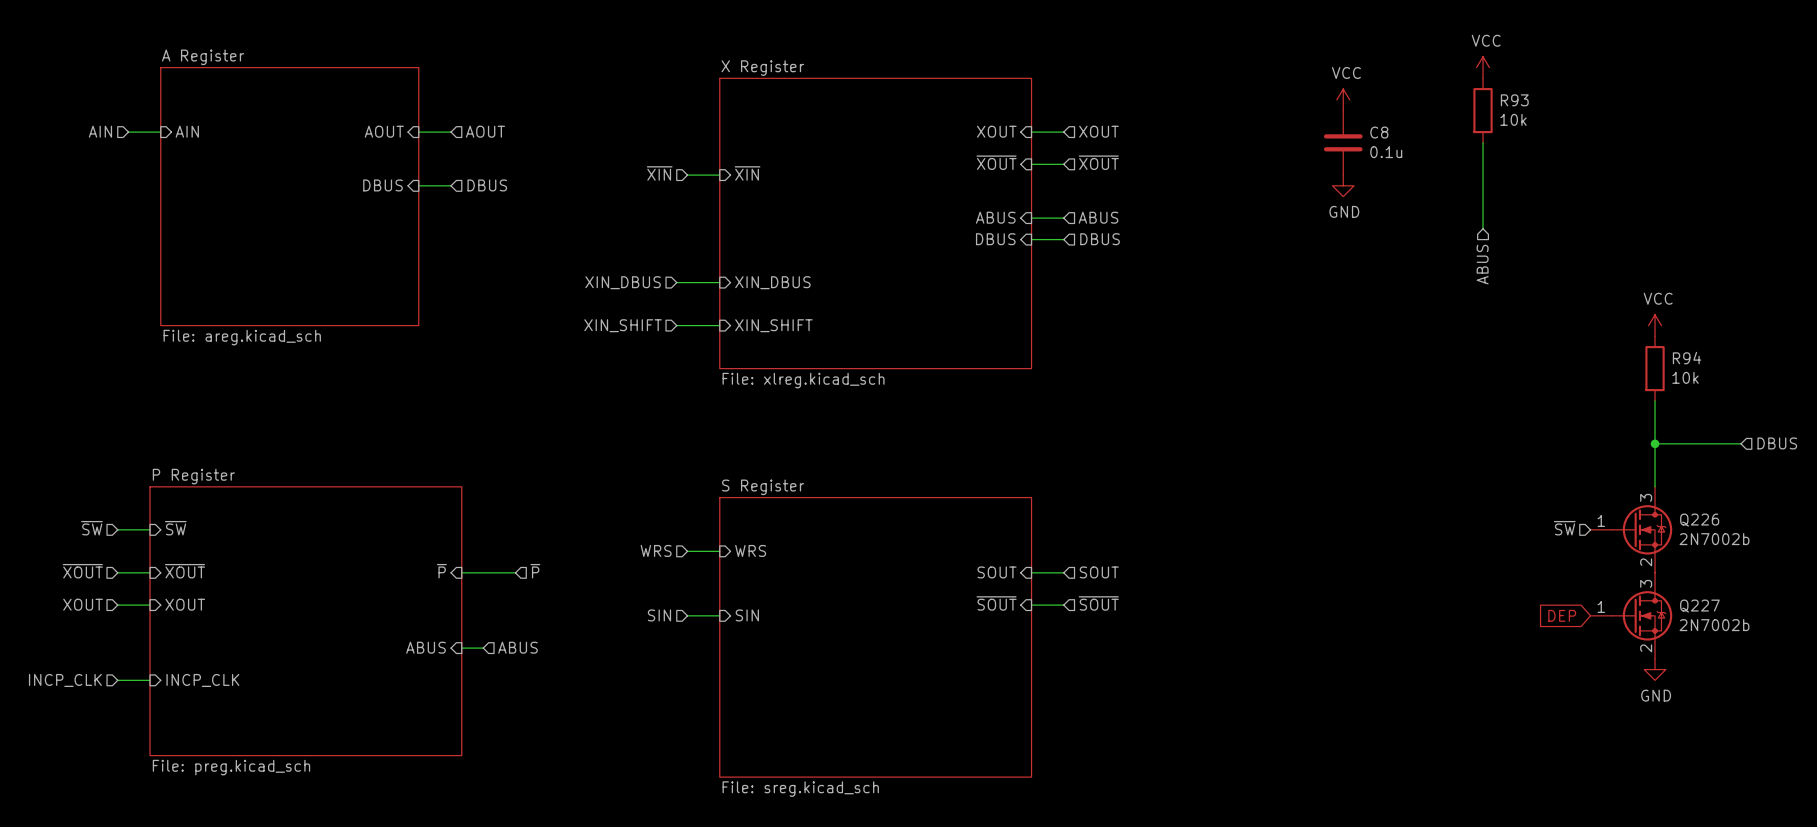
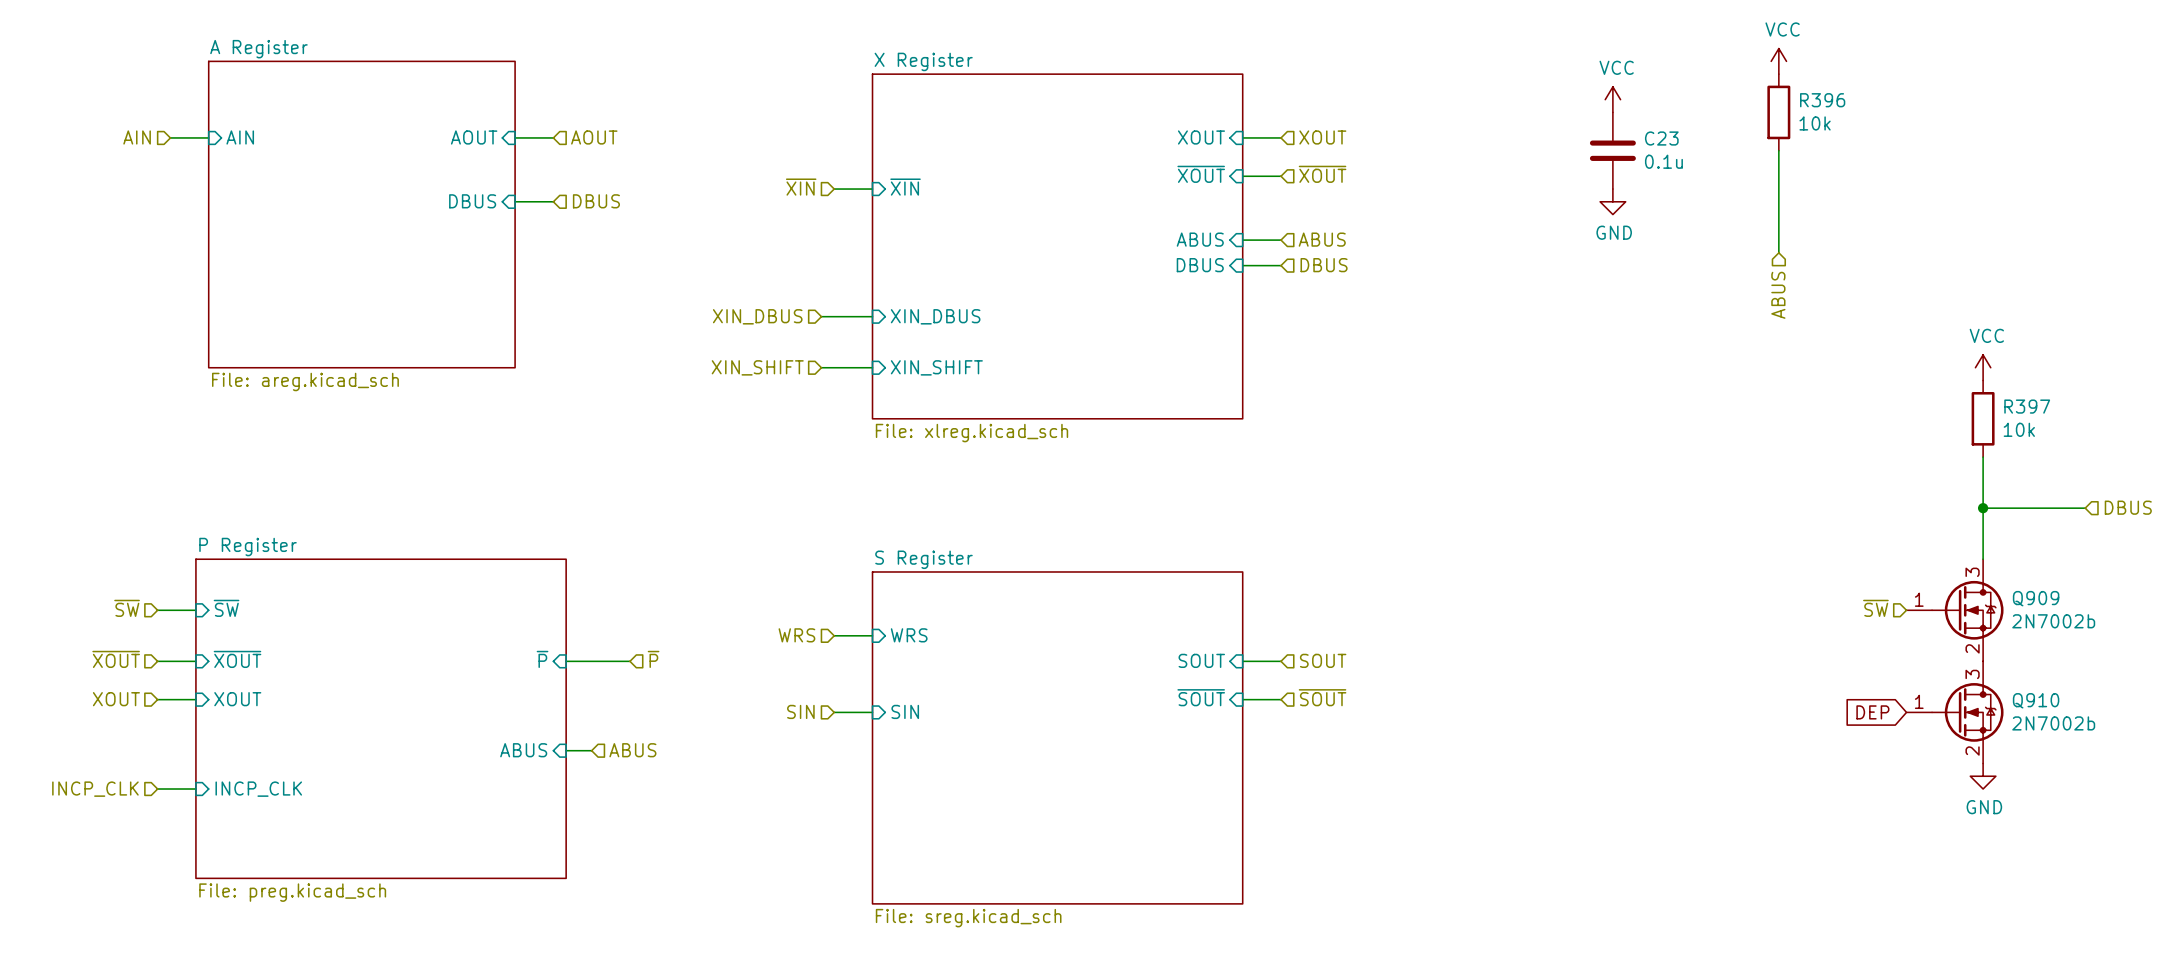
R93 name: R93 (1514, 100) -> R396 (1822, 100)
C8 name: C8 (1379, 132) -> C23 (1661, 138)
R94 name: R94 (1687, 358) -> R397 (2027, 406)
Q226 name: Q226 (1699, 520) -> Q909 (2036, 598)
Q227 name: Q227 (1699, 606) -> Q910 (2036, 700)

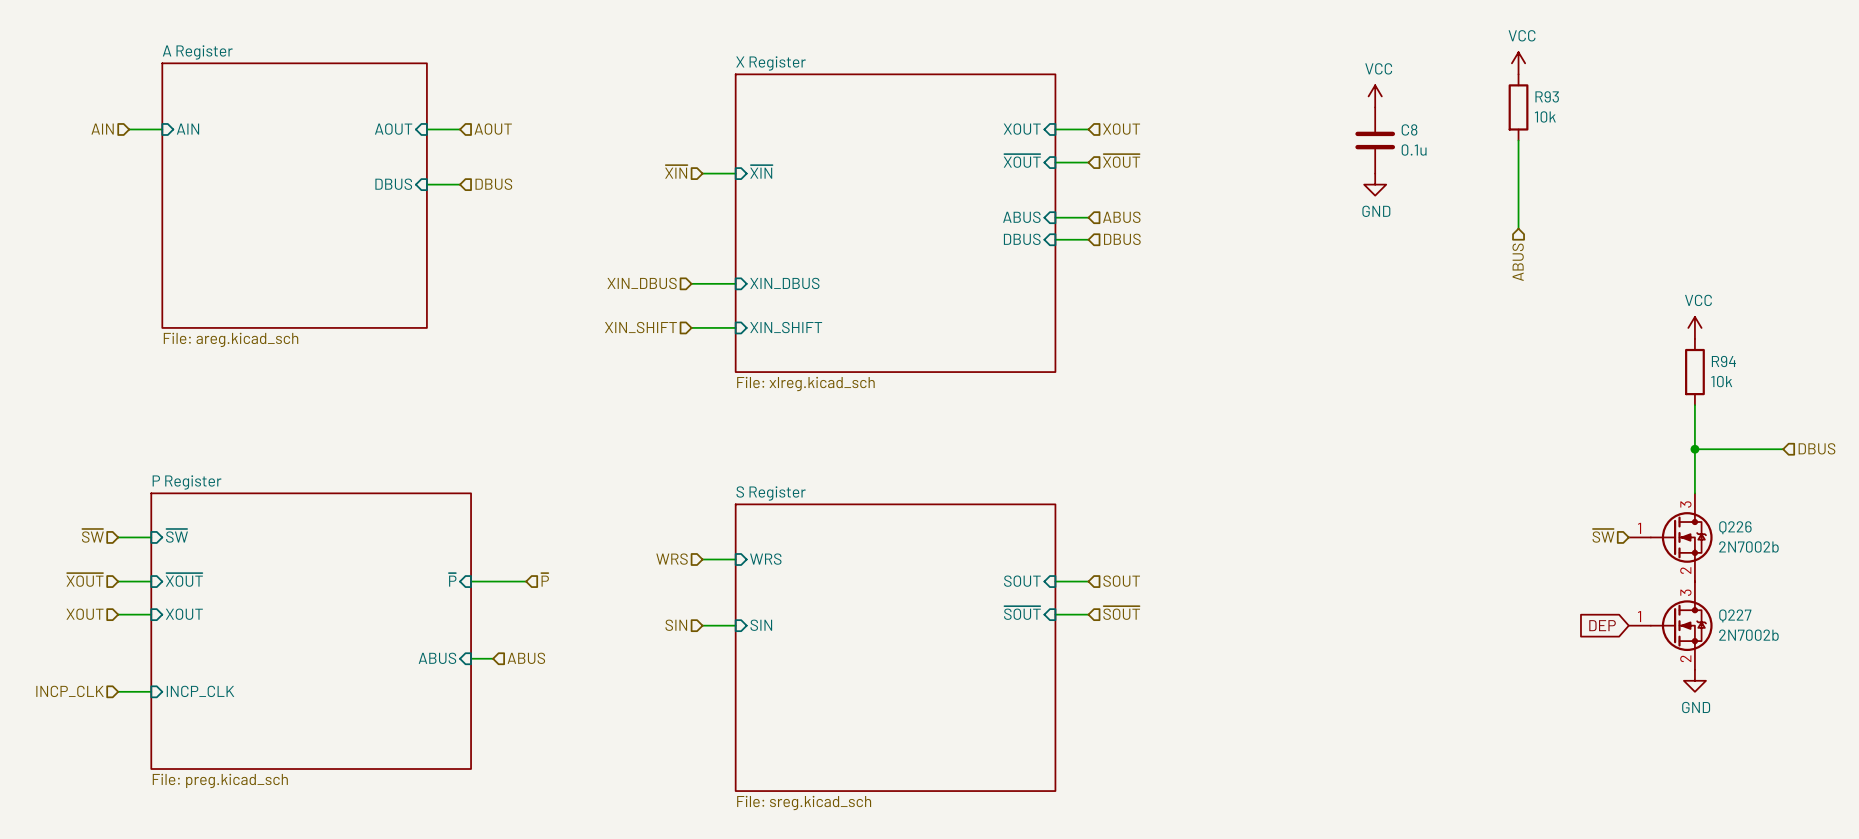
R396 name: R396 (1822, 100) -> R93 (1547, 96)
C23 name: C23 (1661, 138) -> C8 (1409, 129)
R397 name: R397 (2027, 406) -> R94 (1723, 361)
Q909 name: Q909 (2036, 598) -> Q226 (1735, 527)
Q910 name: Q910 (2036, 700) -> Q227 (1735, 615)

